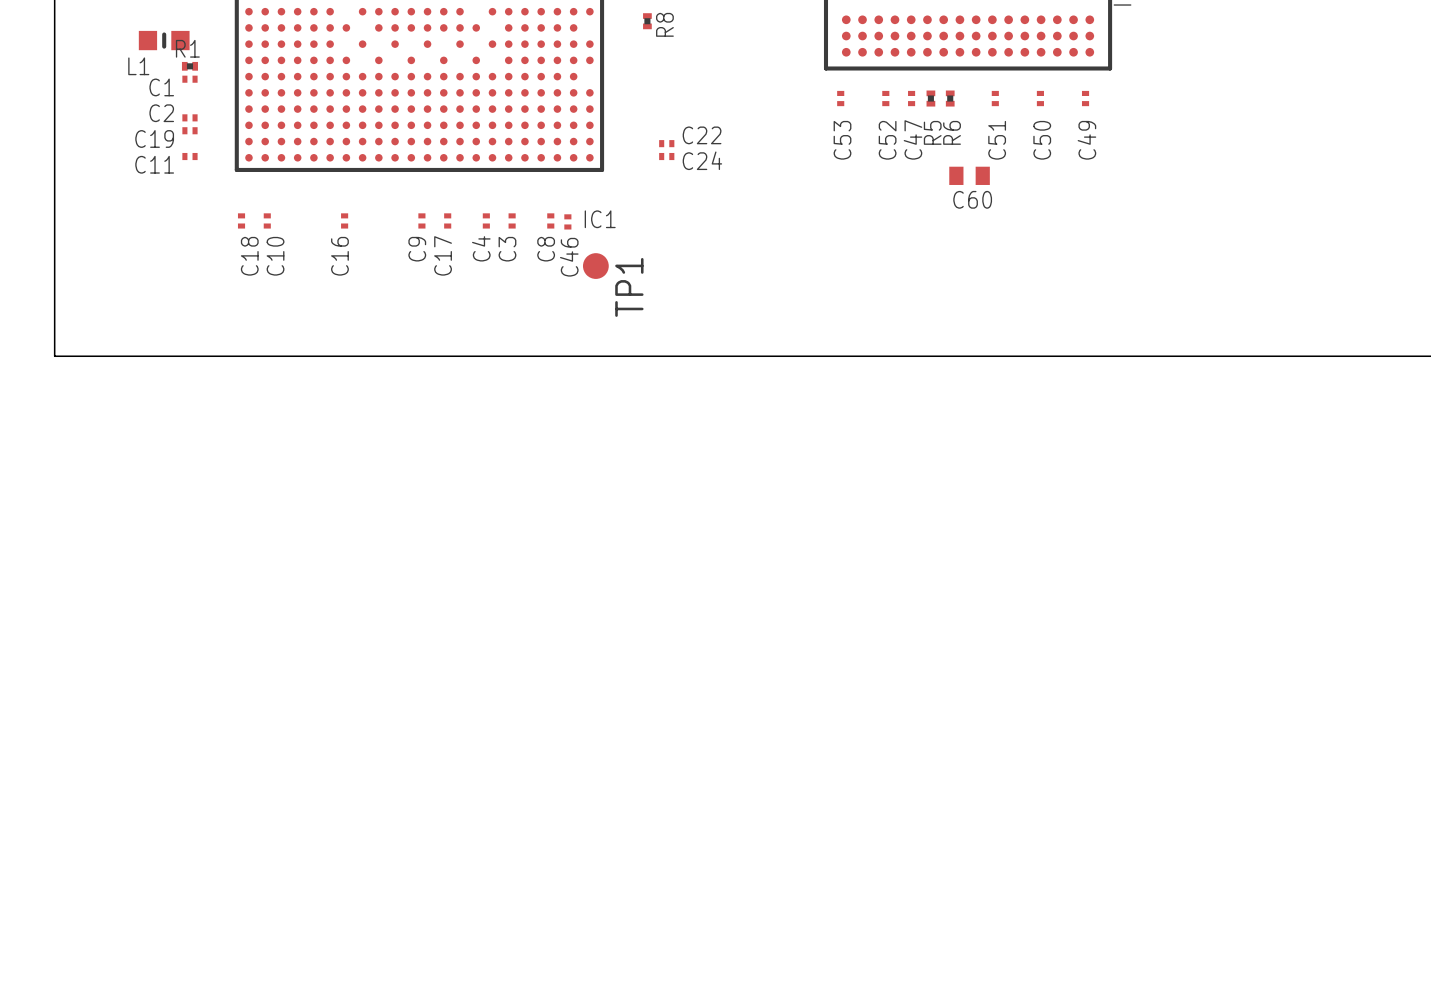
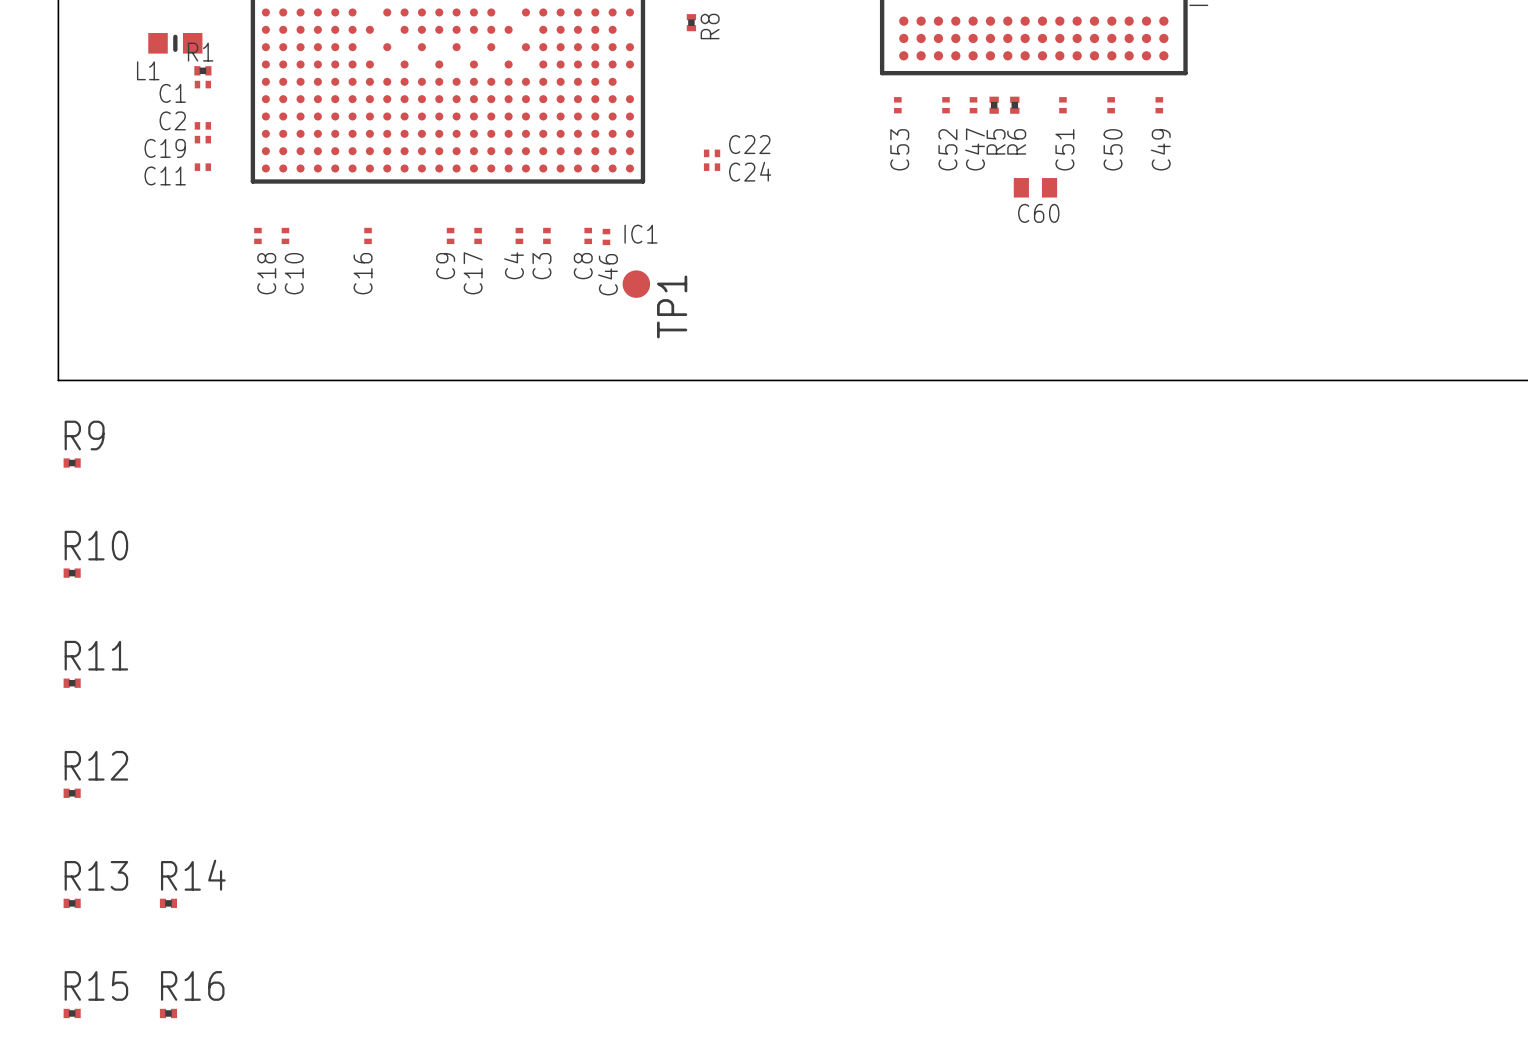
R9: none -> (72, 463)
R10: none -> (72, 573)
R11: none -> (72, 683)
R12: none -> (72, 793)
R13: none -> (72, 903)
R14: none -> (168, 903)
R15: none -> (72, 1013)
R16: none -> (168, 1013)

